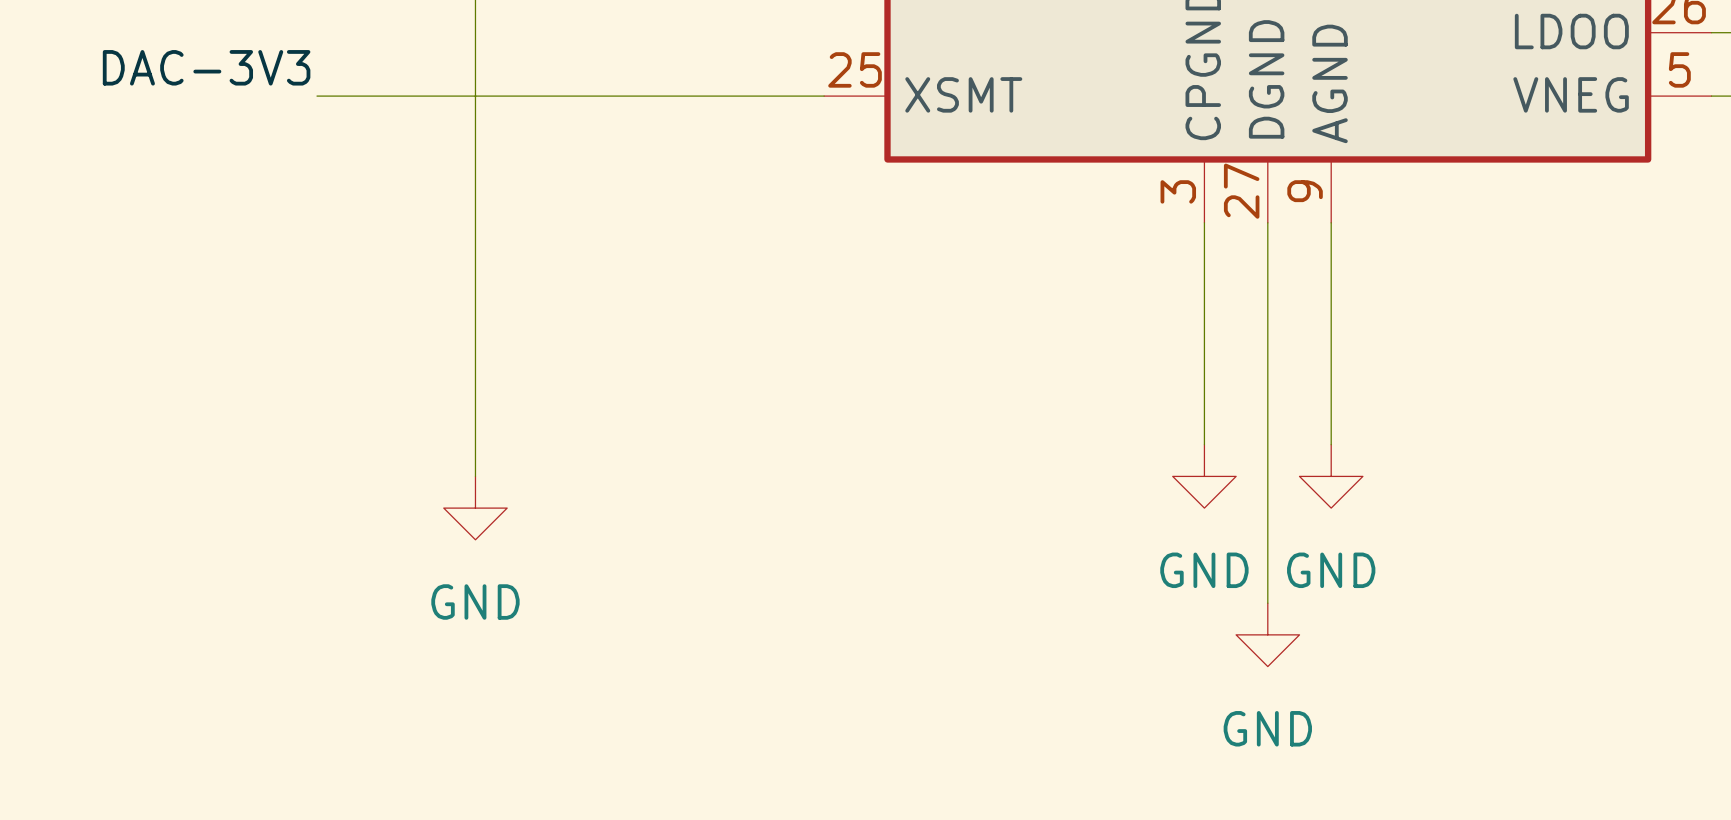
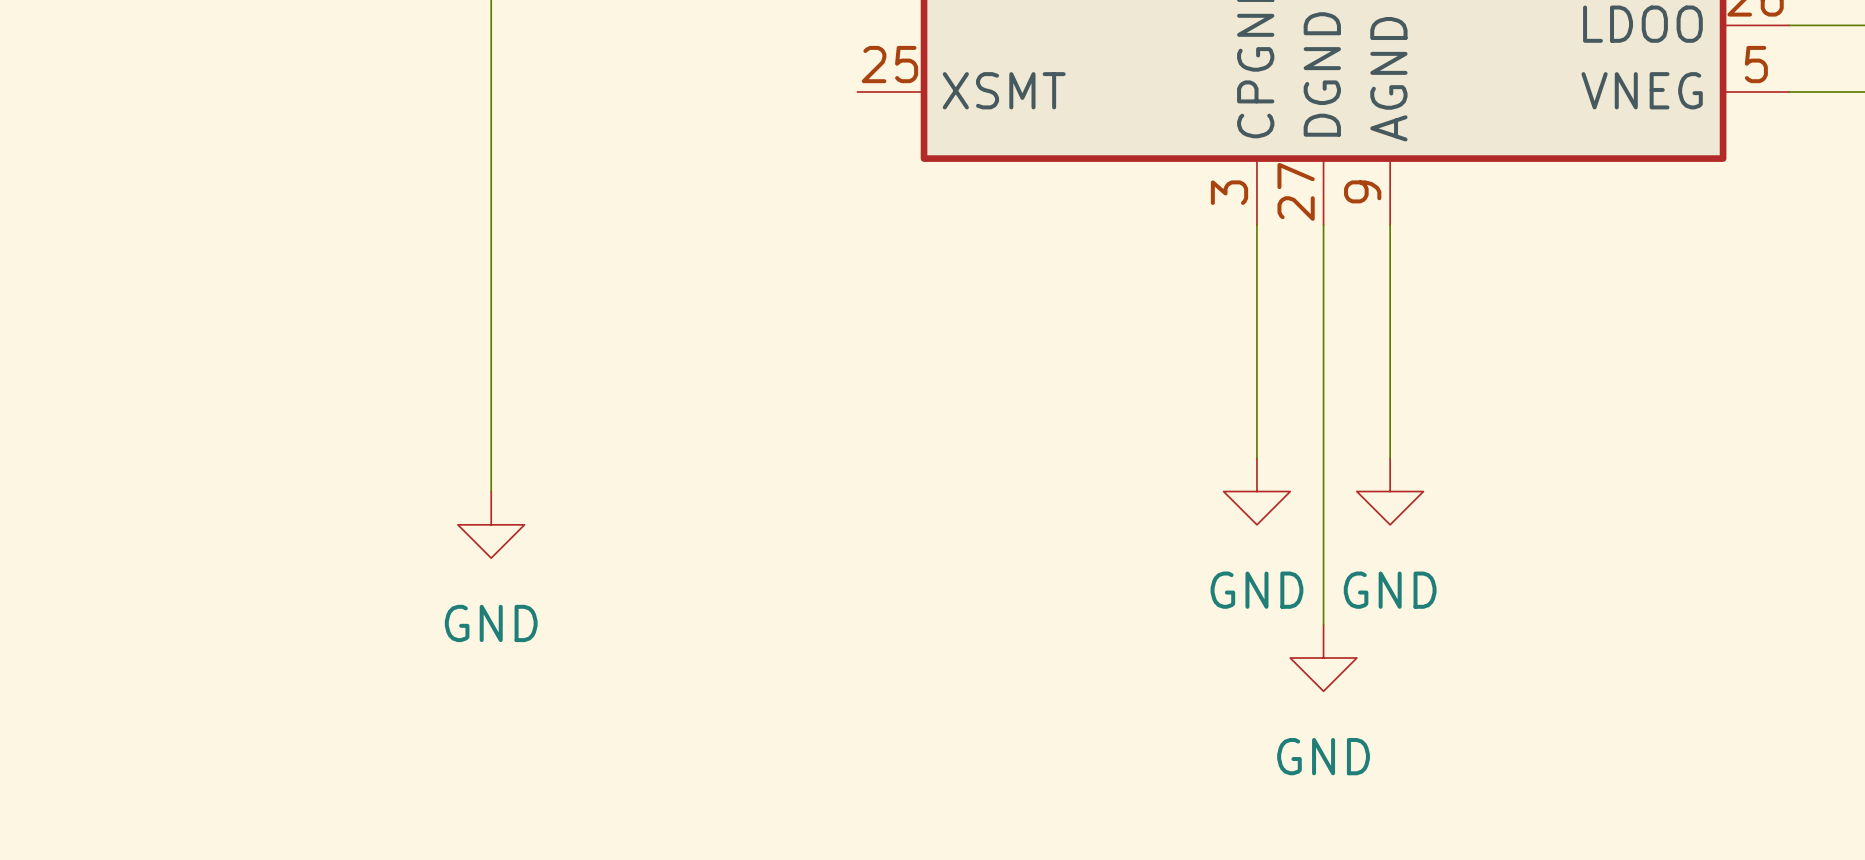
label: DAC-3V3 (206, 67) -> none
wire: (317, 96) (824, 96) -> none

